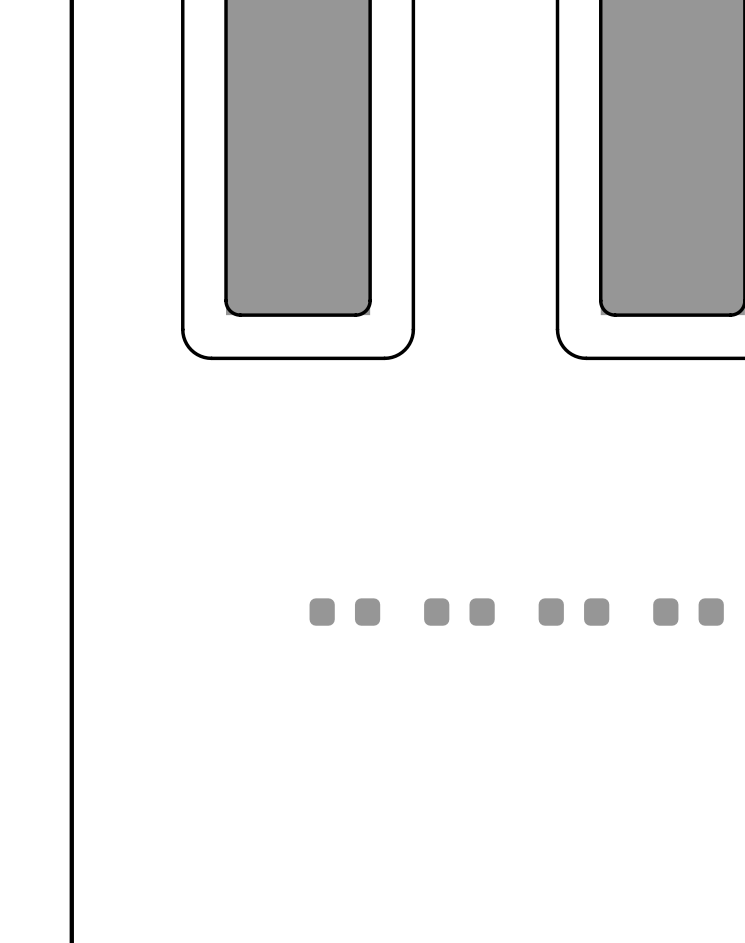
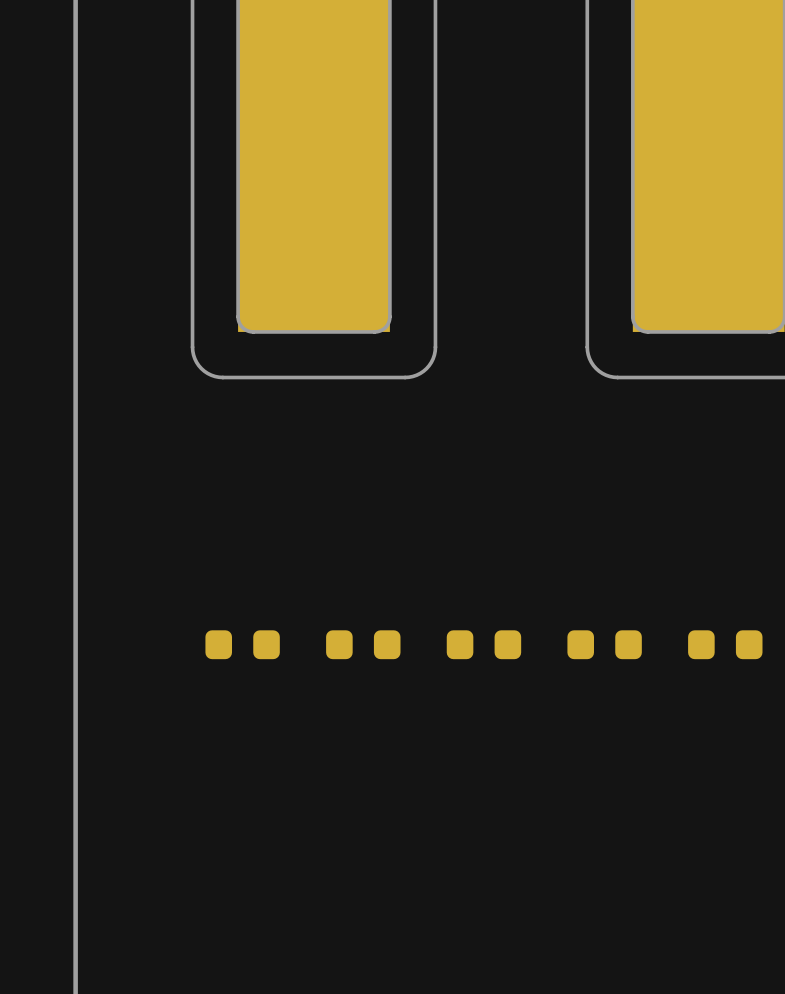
part: none -> (242, 644)

